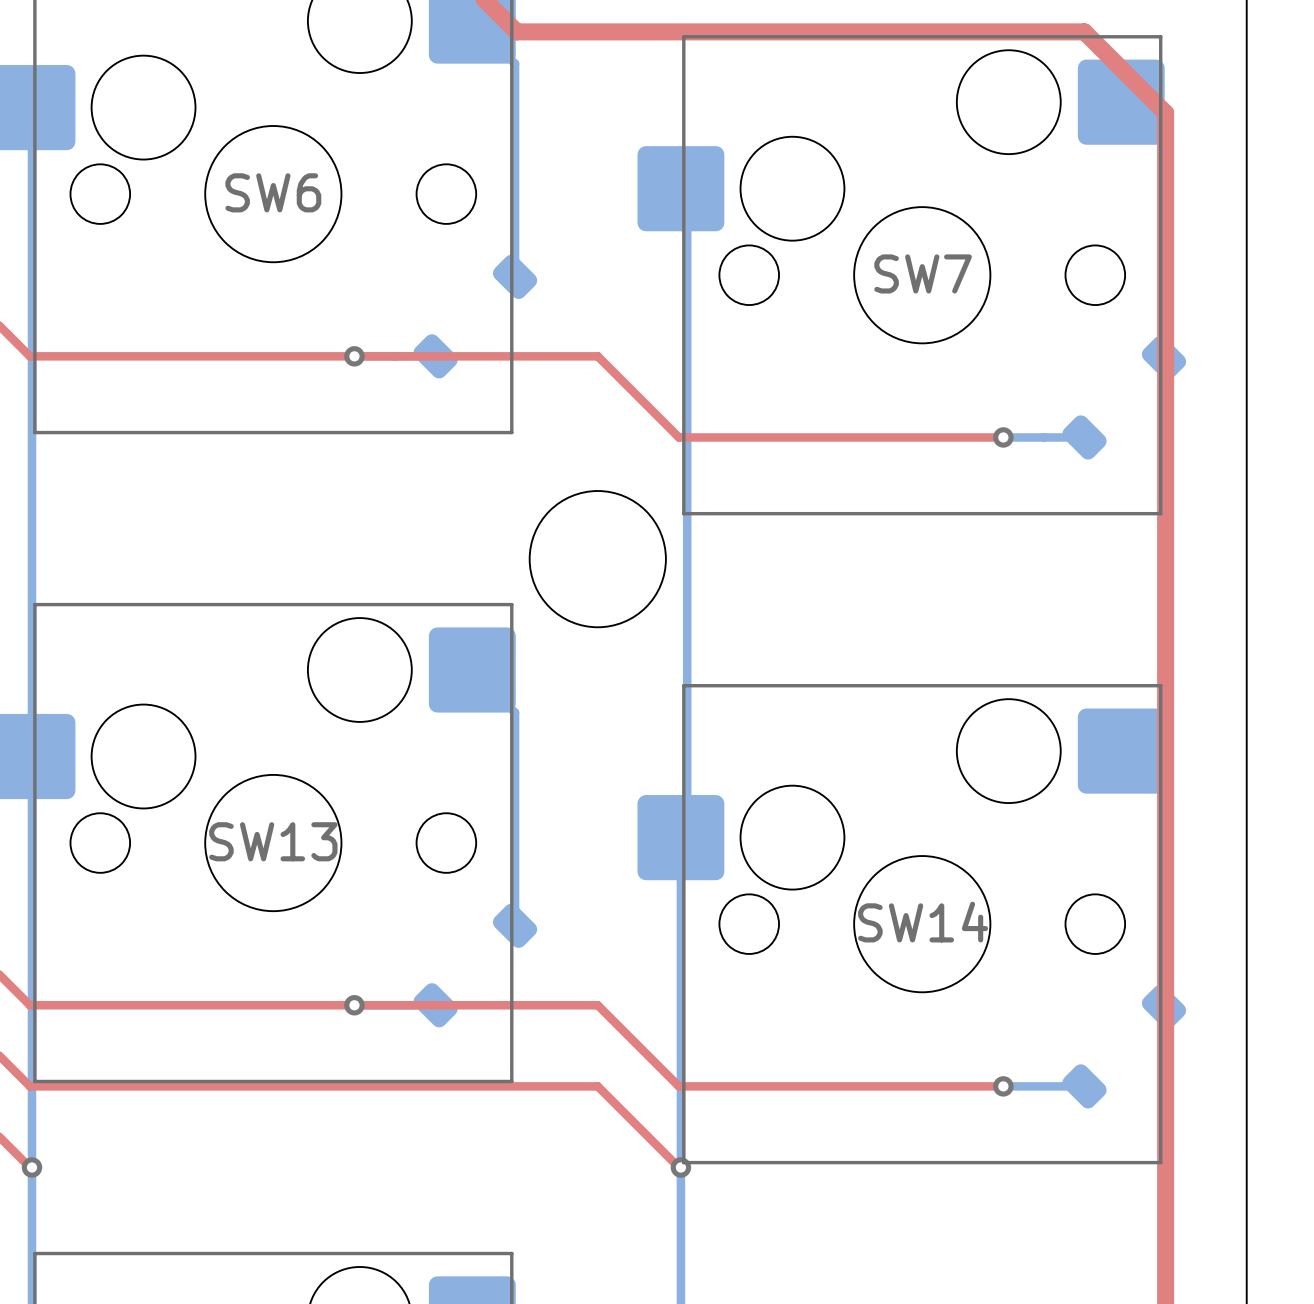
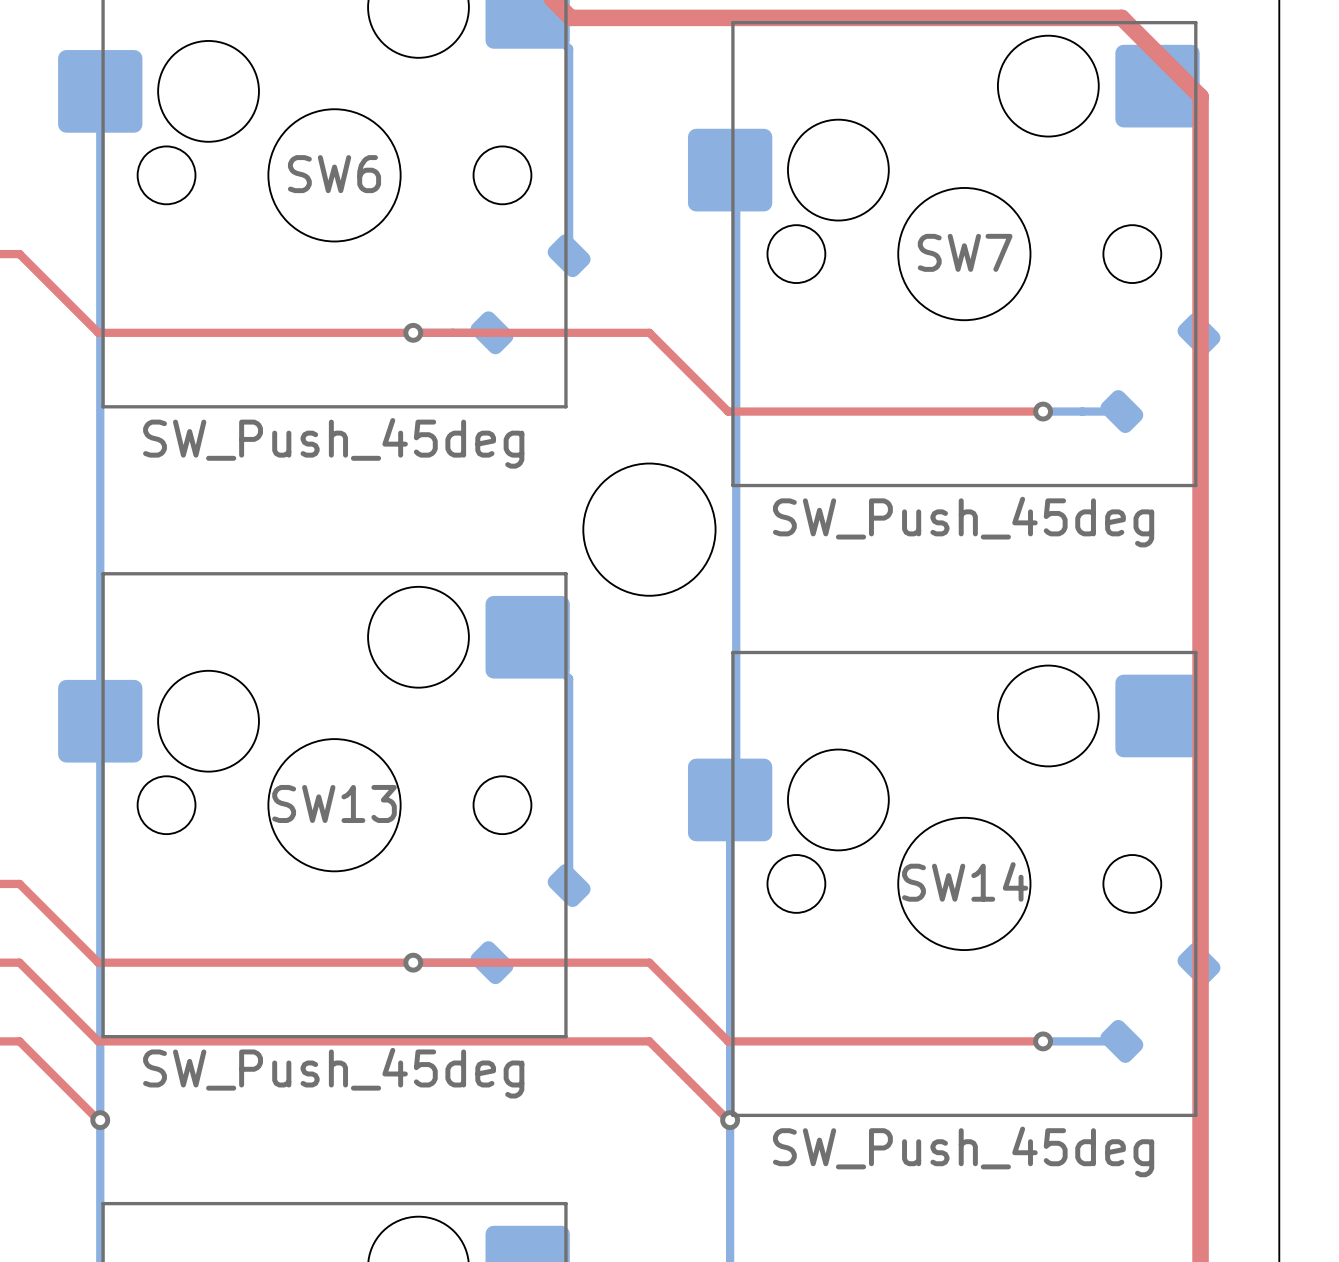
SW6 value: none -> SW_Push_45deg (333, 443)
SW7 value: none -> SW_Push_45deg (963, 522)
SW13 value: none -> SW_Push_45deg (333, 1073)
SW14 value: none -> SW_Push_45deg (963, 1151)

